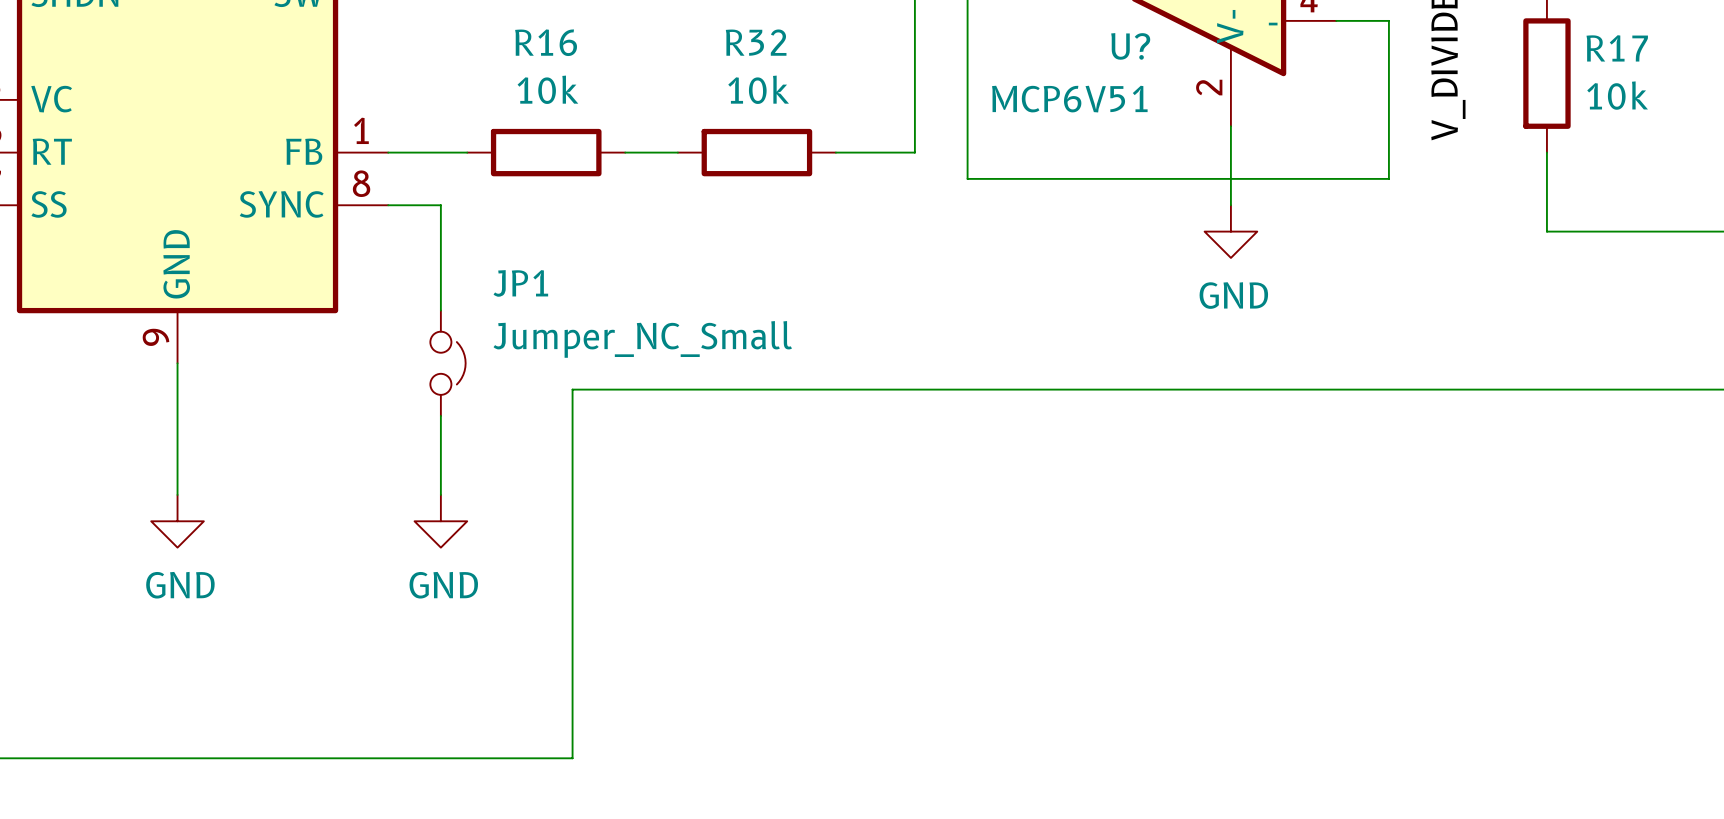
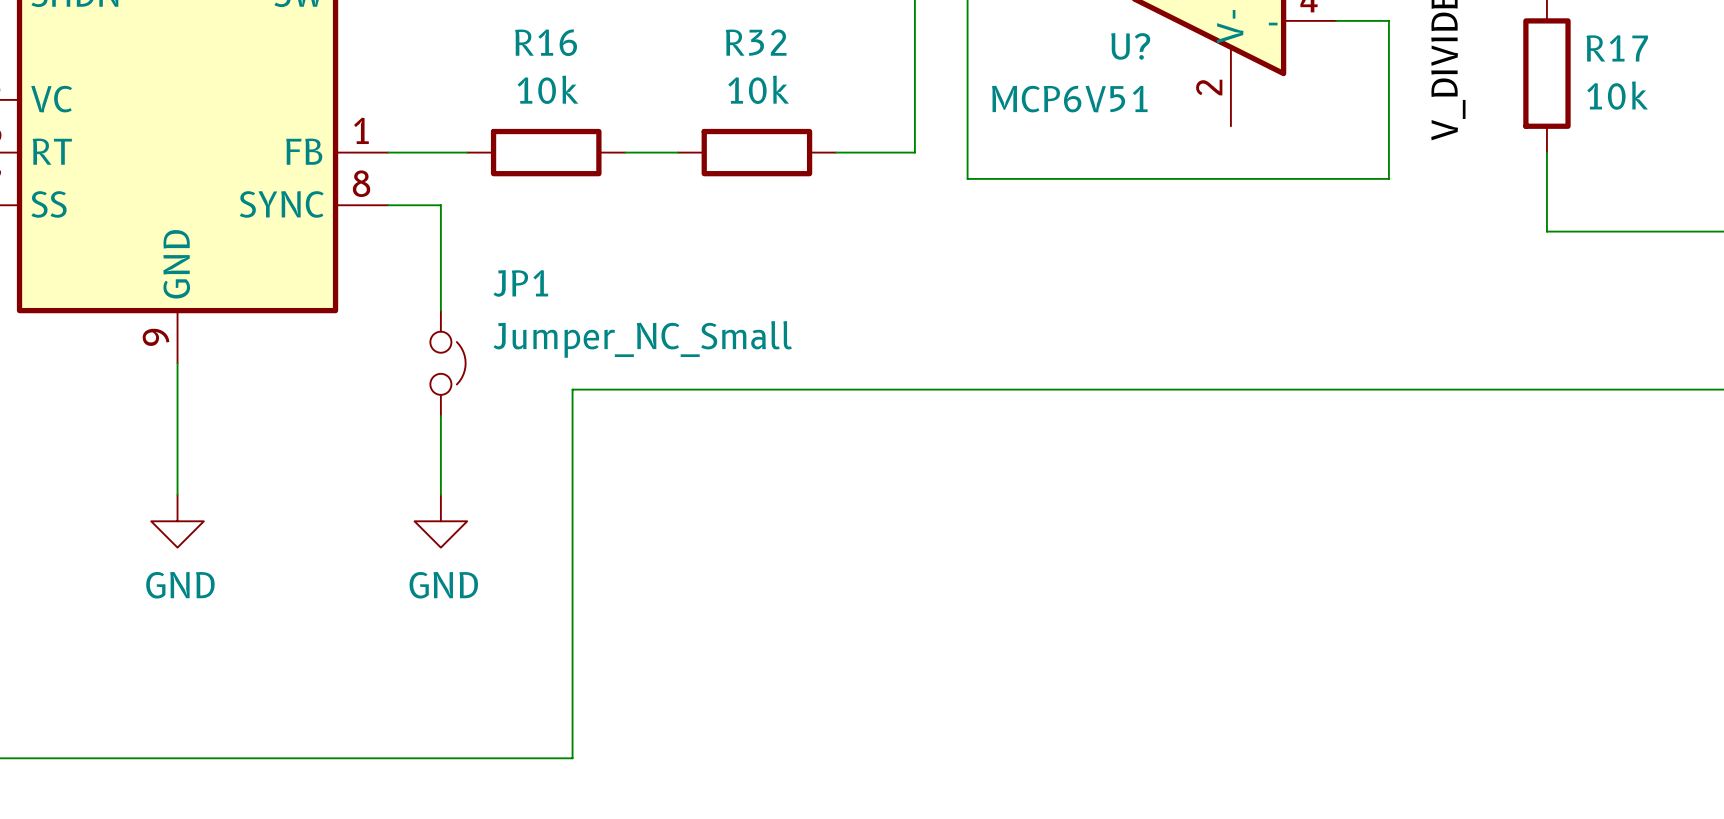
wire: (1230, 126) (1230, 205) -> none
power symbol: GND (1230, 231) -> none

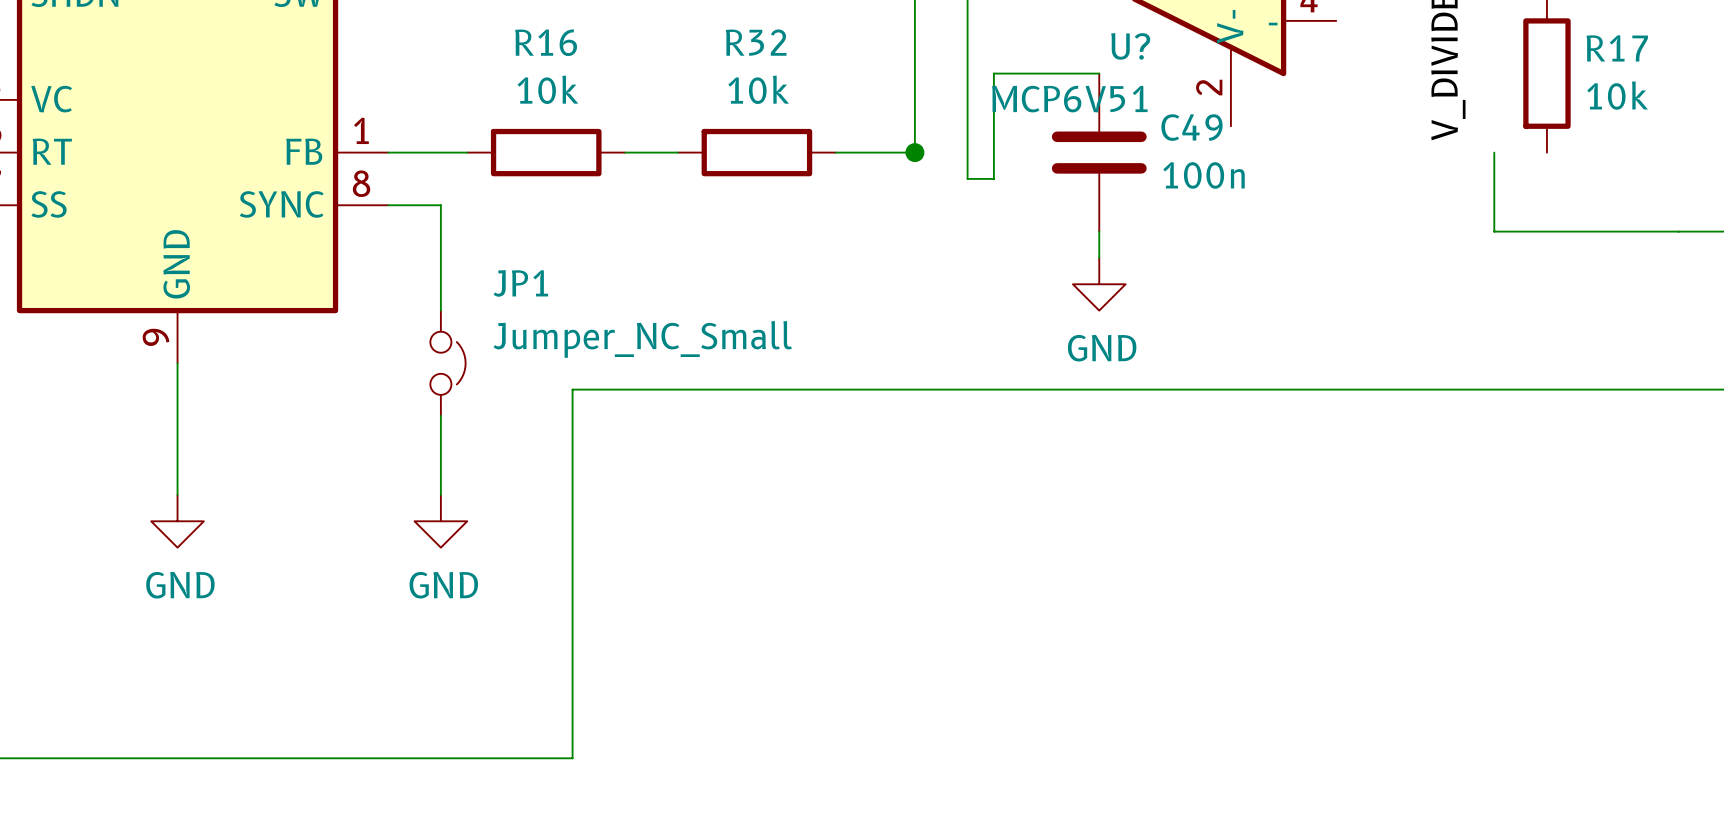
wire: (1336, 20) (1388, 20) (1388, 178) (993, 178) -> (1099, 73) (993, 73) (993, 178)
junction: none -> (914, 152)
C49: none -> 100n (1099, 152)
wire: (1546, 152) (1546, 231) -> (1494, 152) (1494, 231) (1546, 231)
wire: none -> (1099, 231) (1099, 257)
power symbol: none -> GND (1099, 284)

